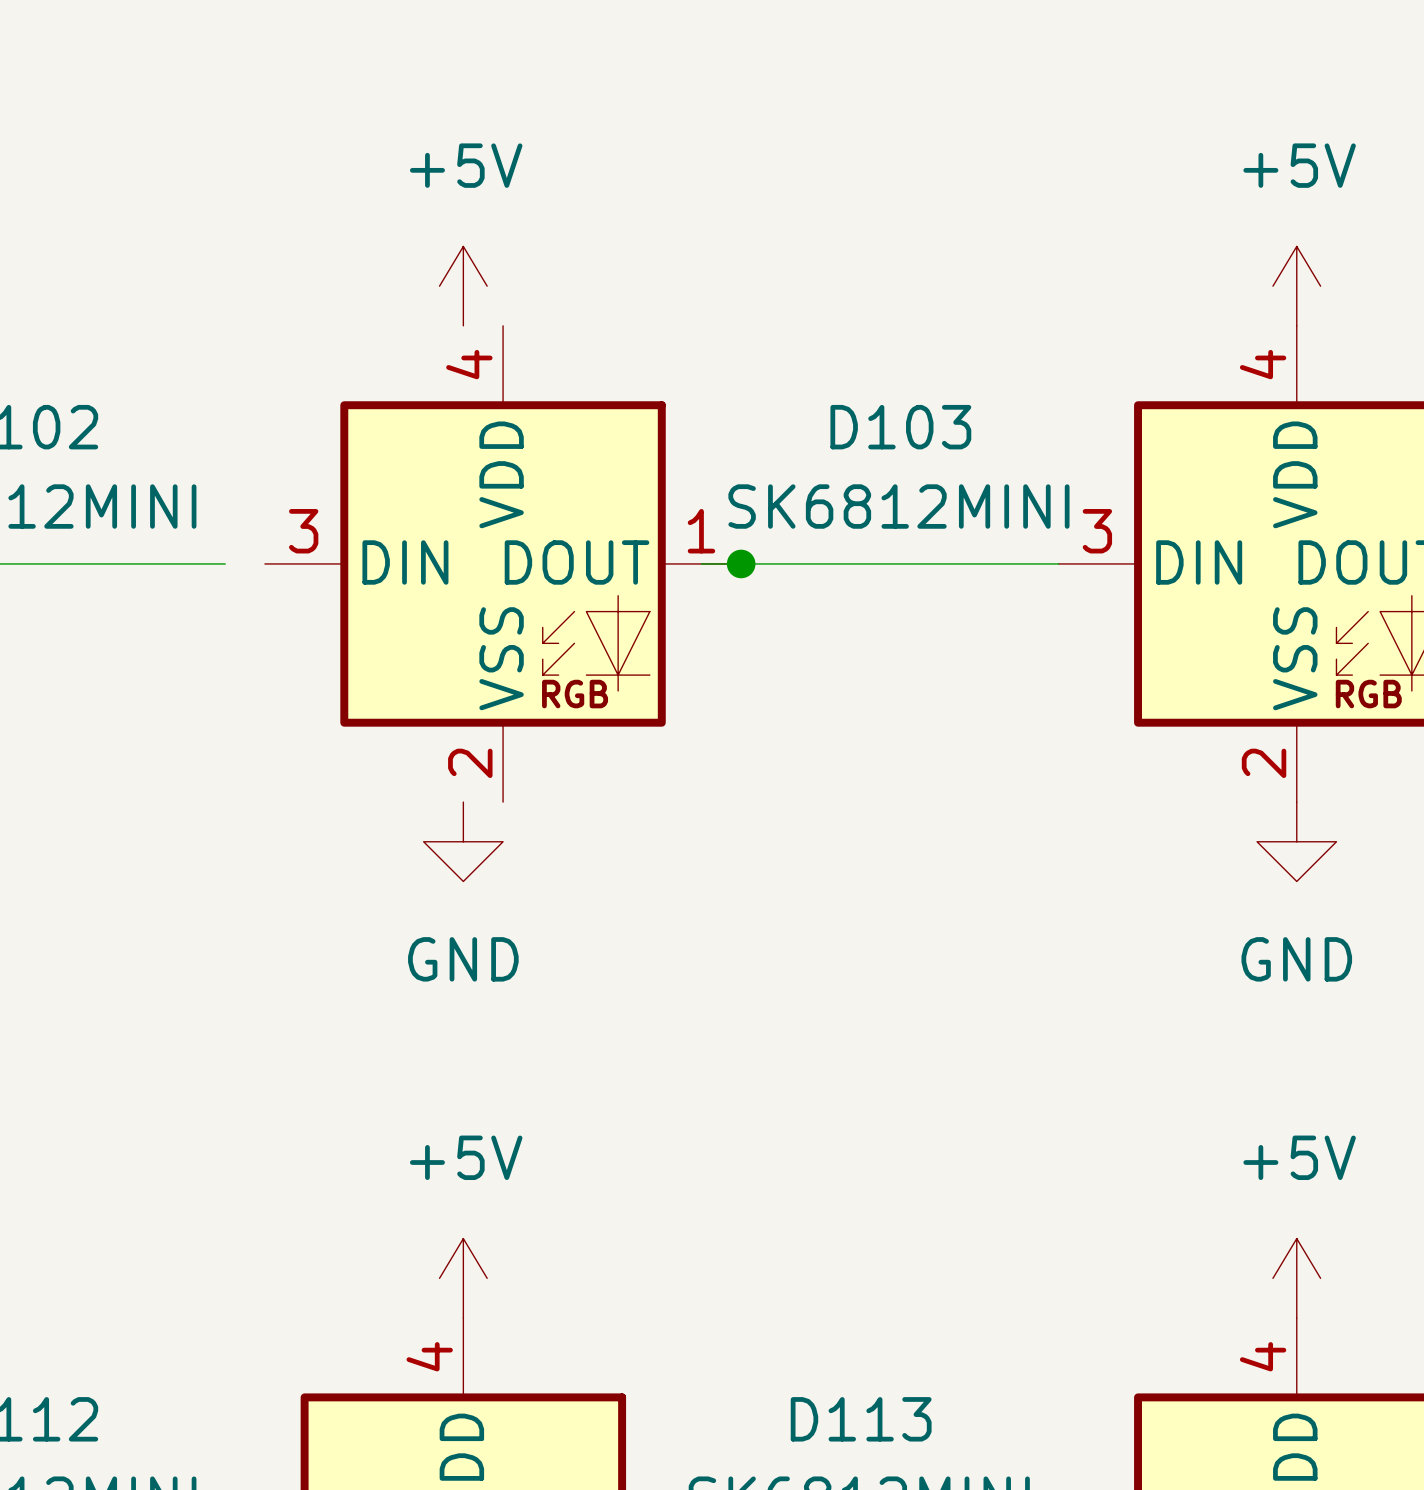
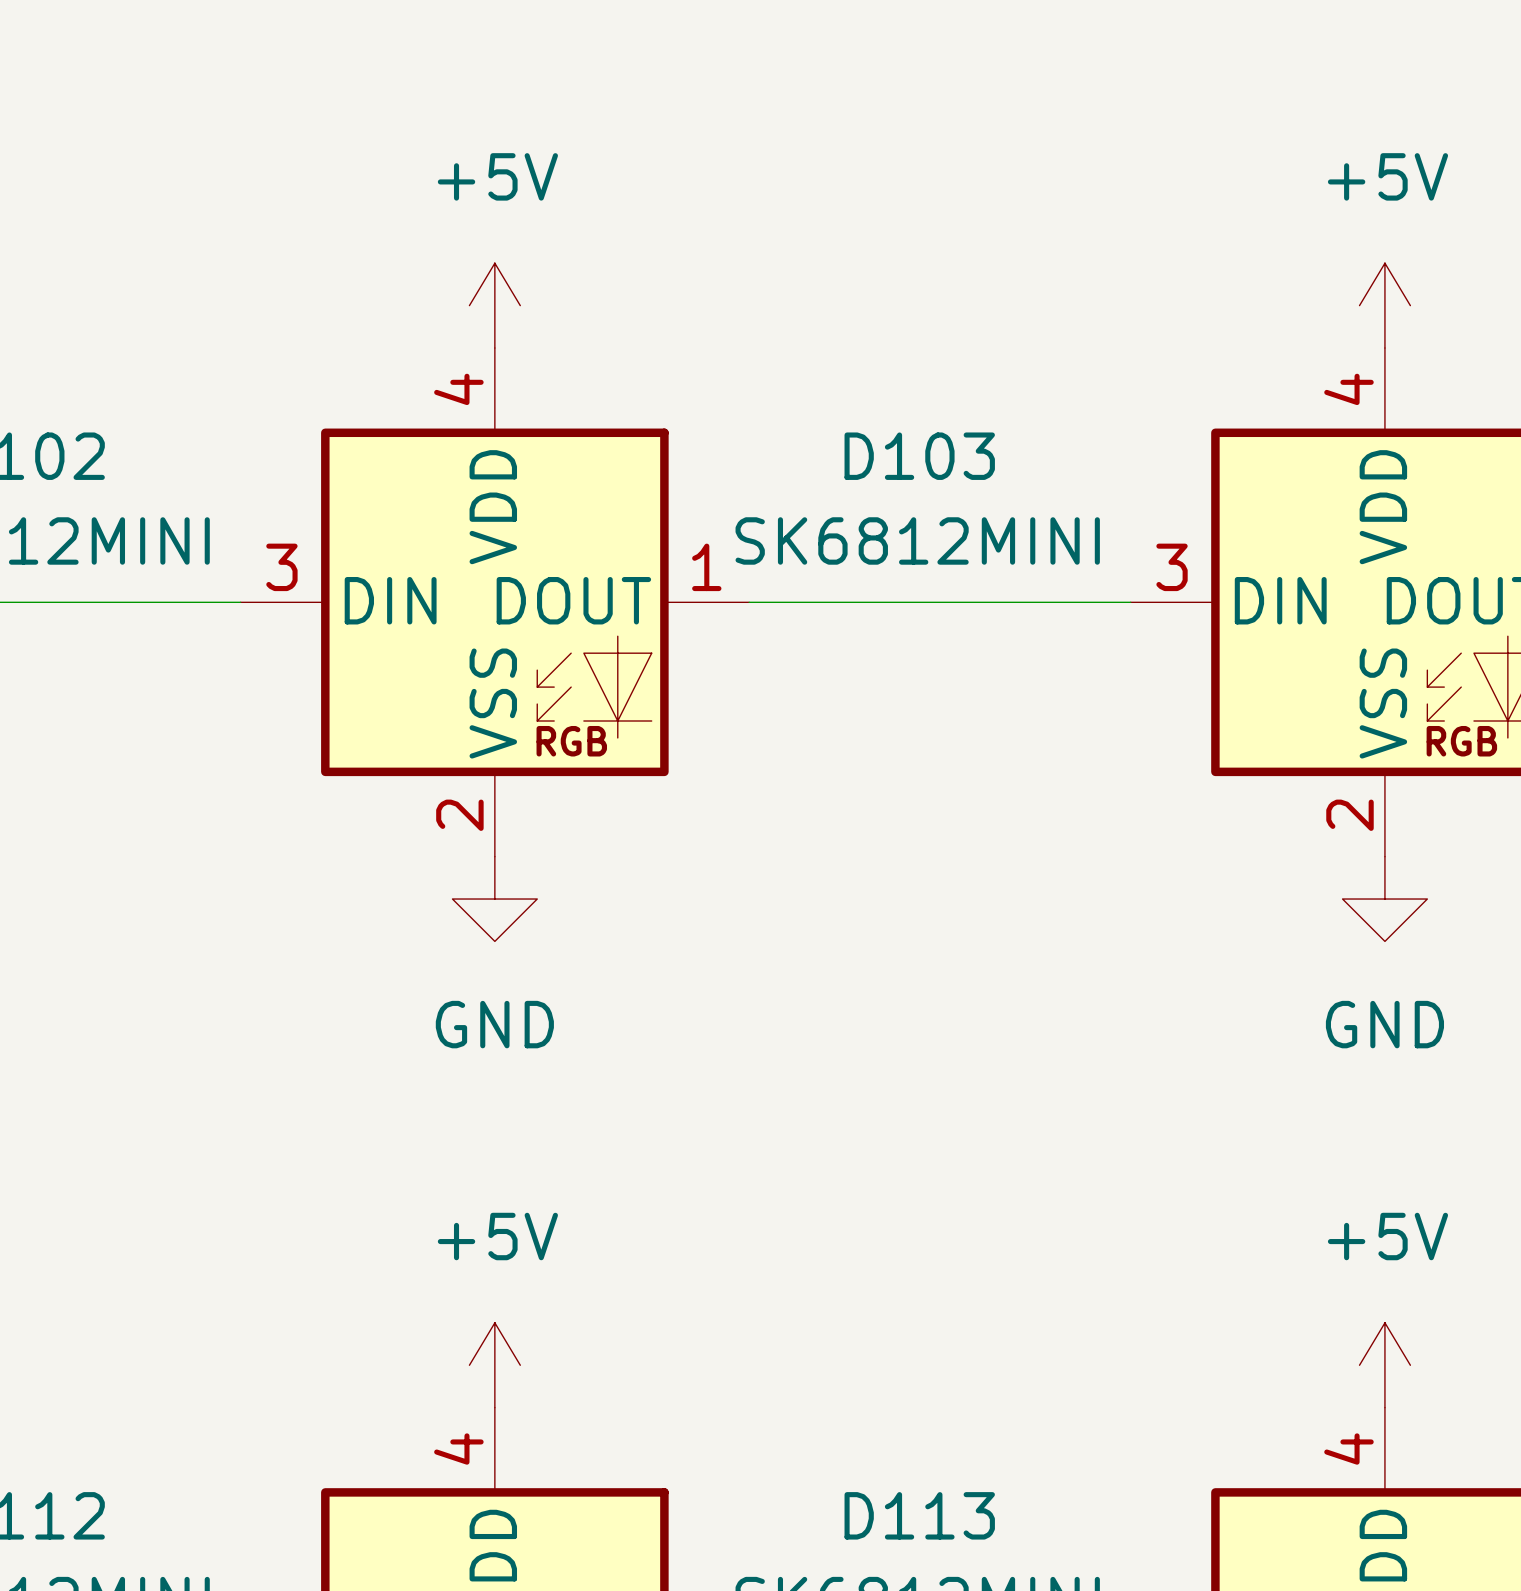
D103 position: (503, 563) -> (494, 602)
junction: (741, 563) -> none

